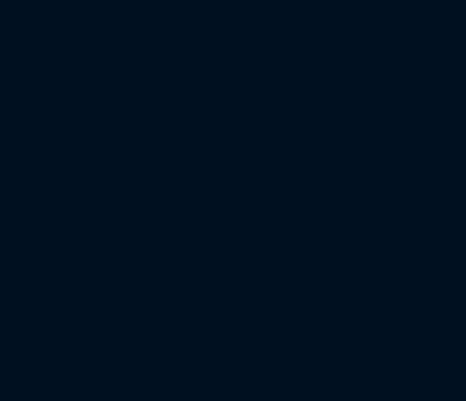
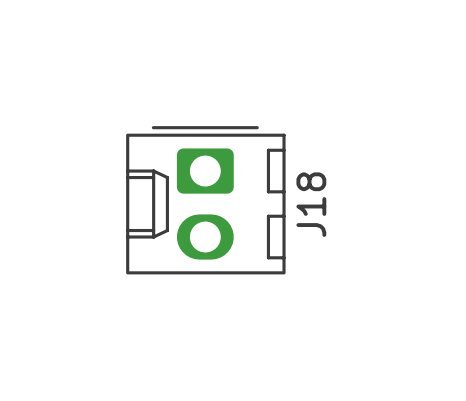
J18: none -> (205, 200)

